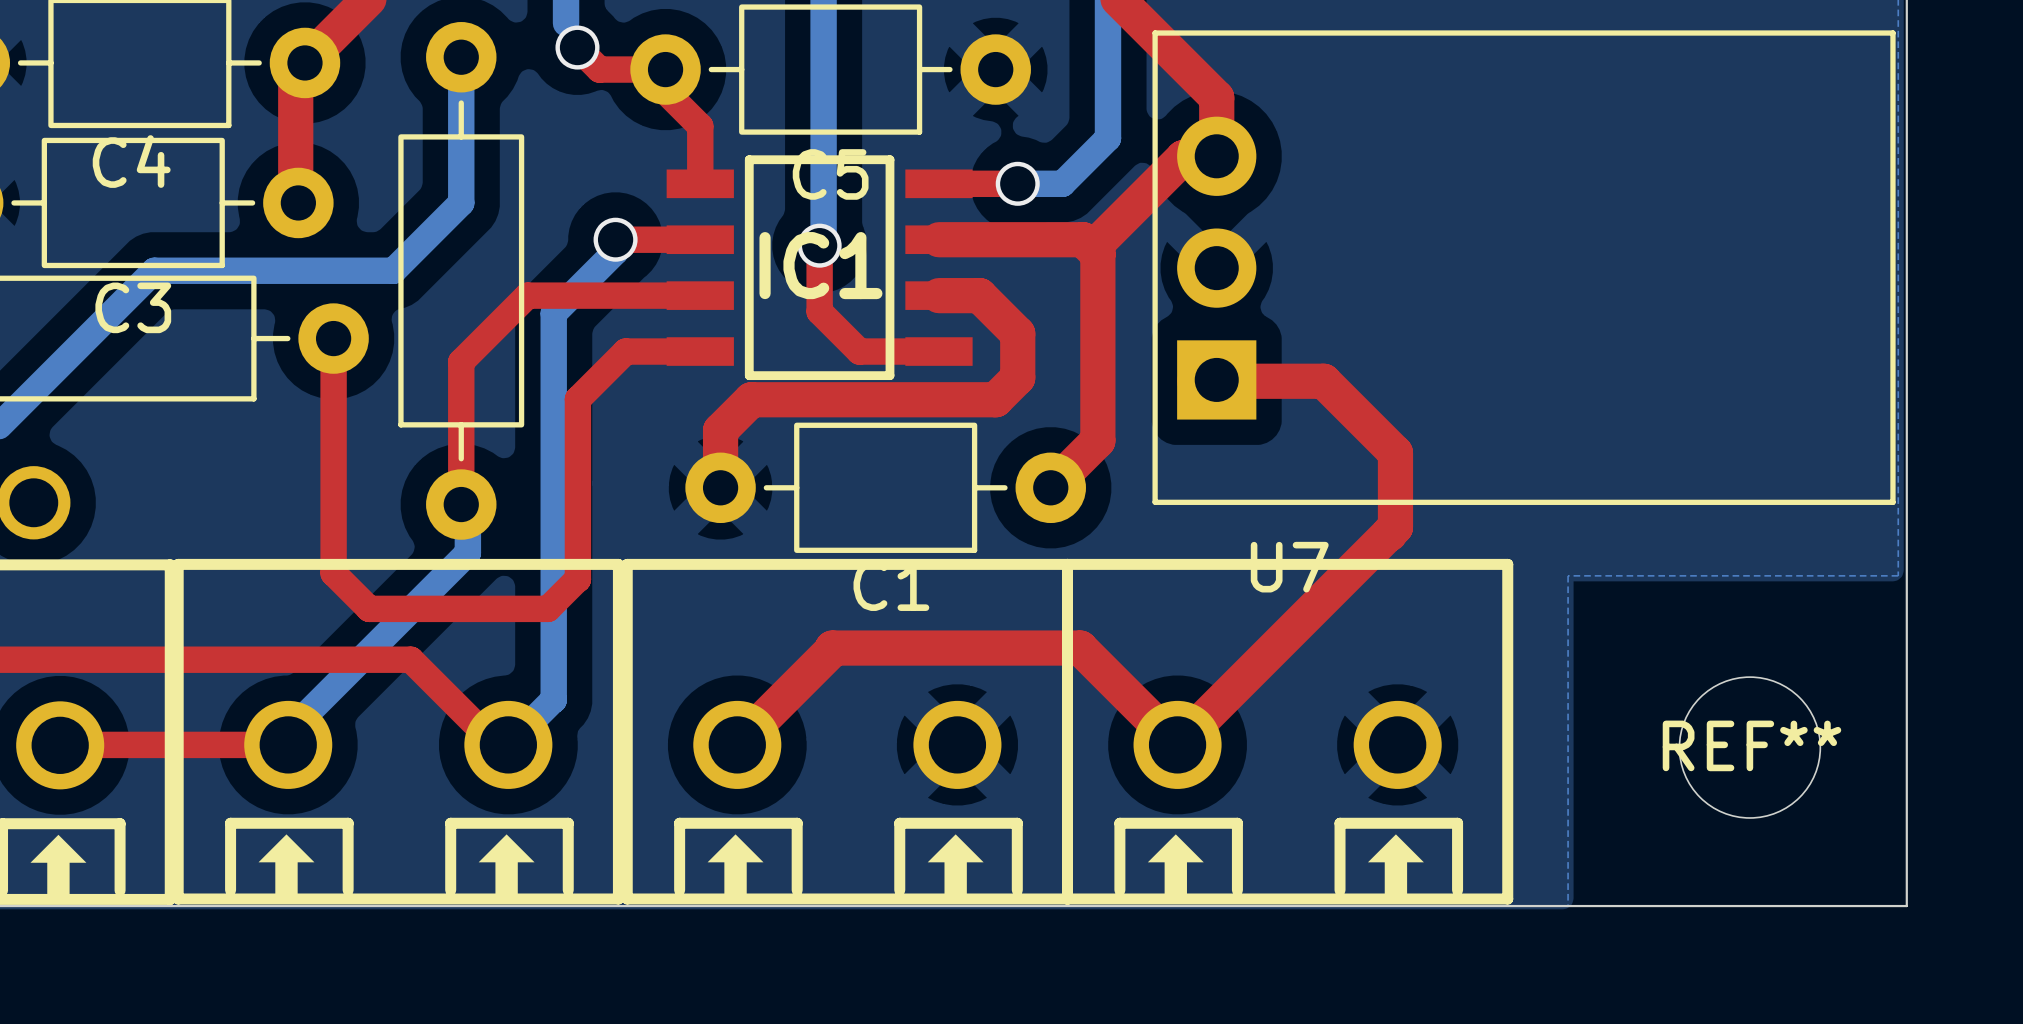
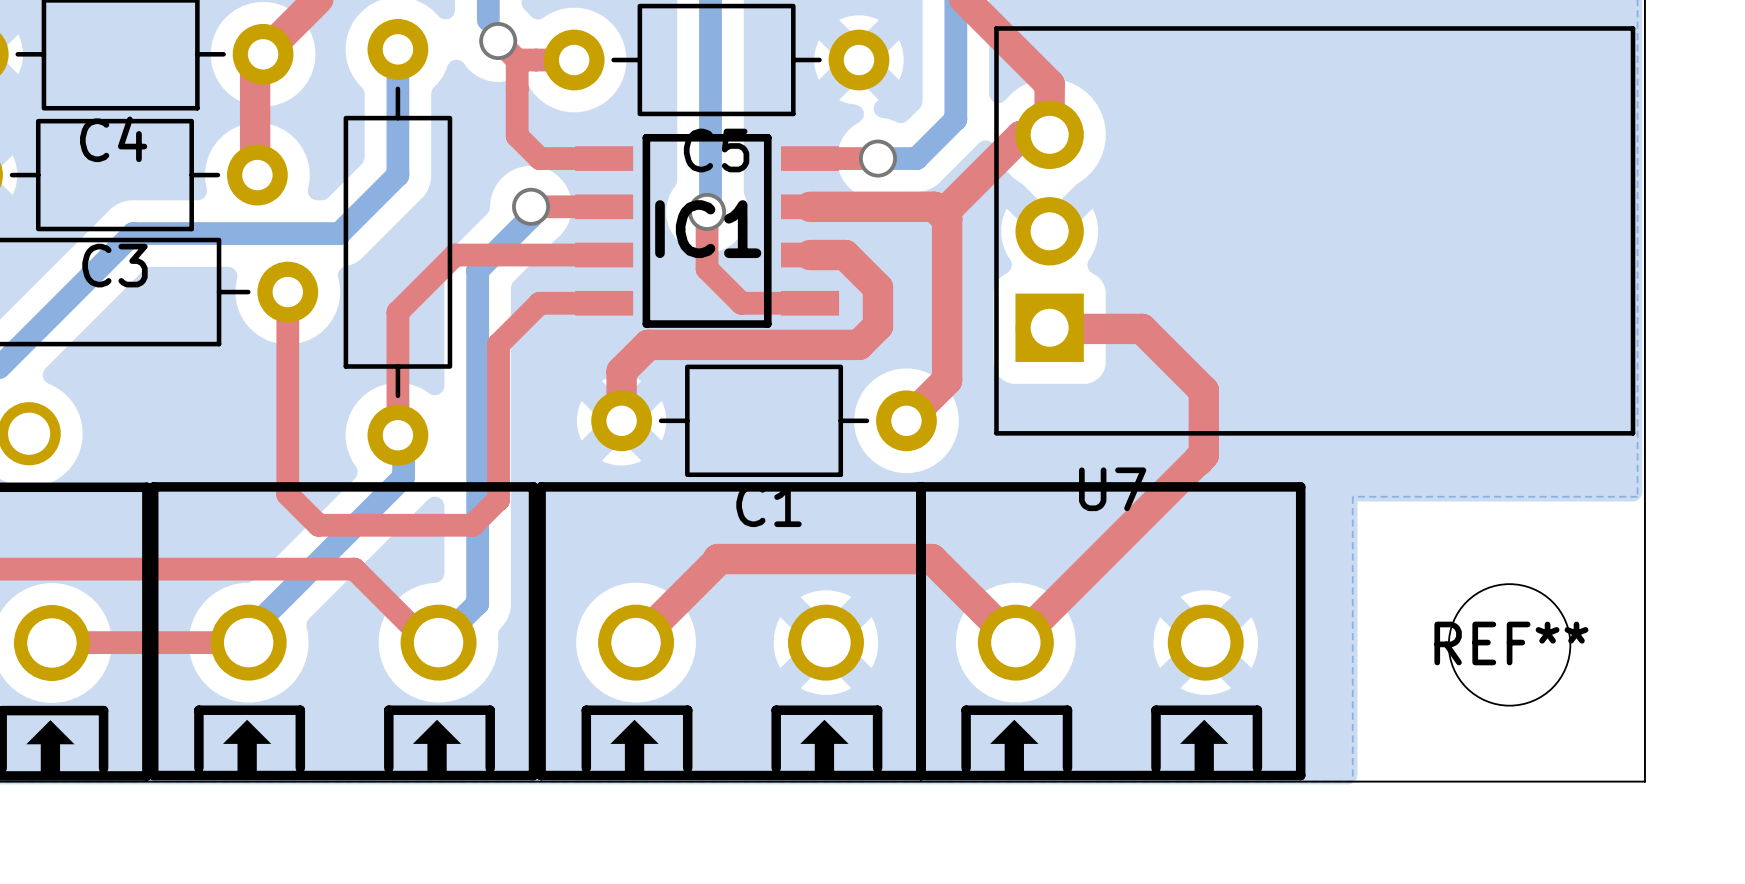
top track: (665, 91) (700, 126) (700, 183) -> (517, 60) (517, 135) (539, 158) (604, 158)

